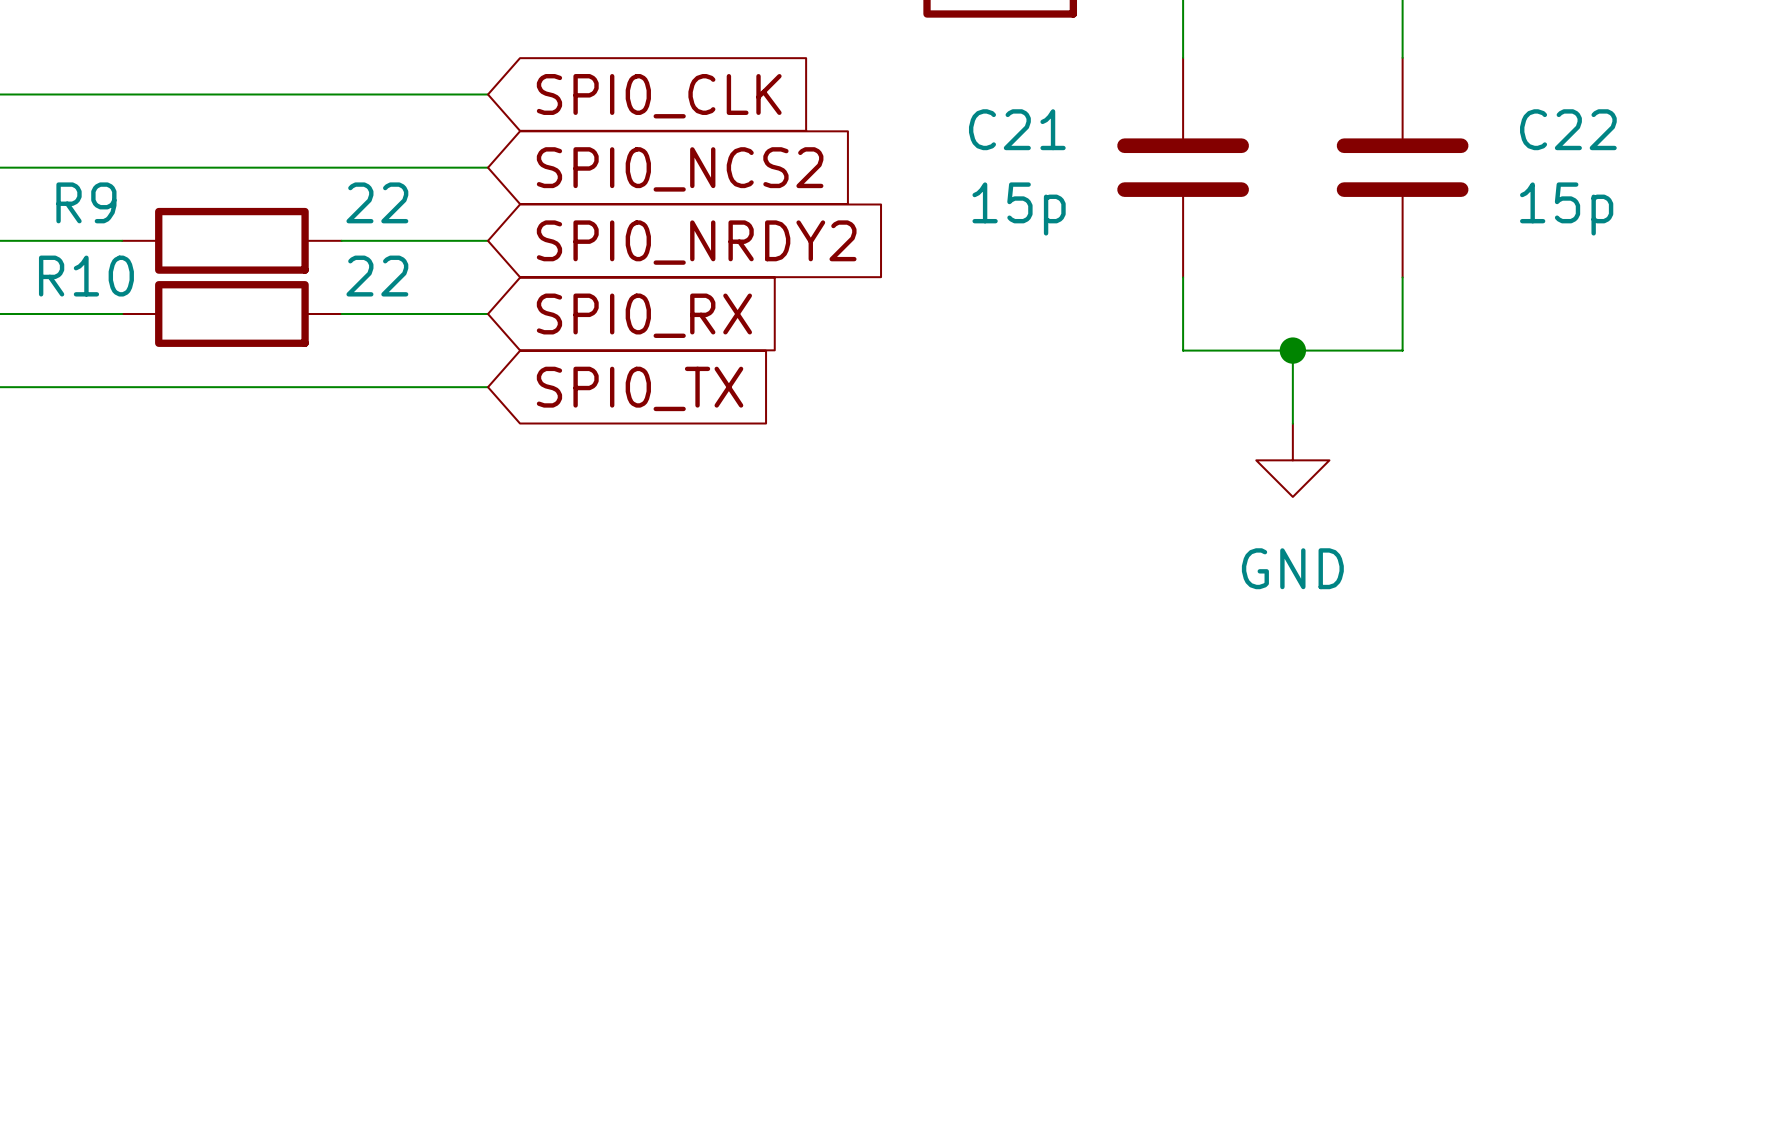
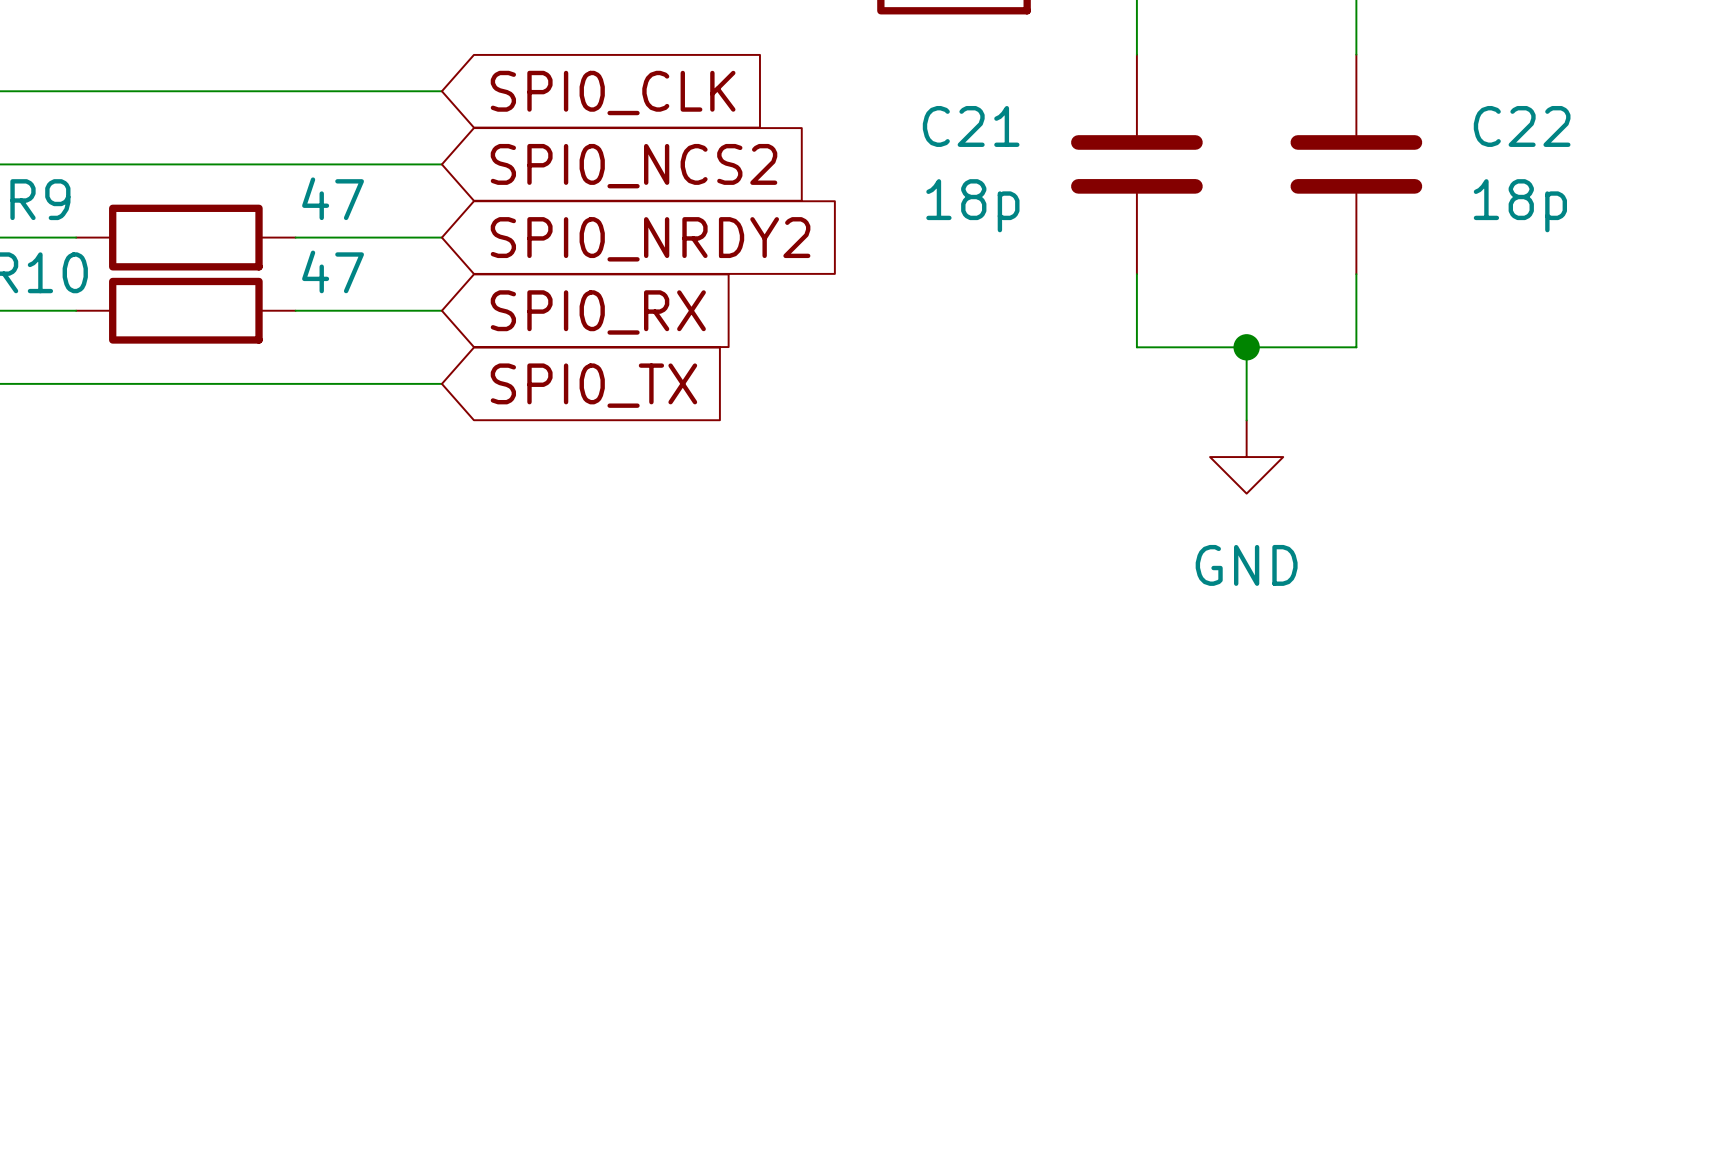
R9 value: 22 (377, 202) -> 47 (333, 198)
C21 value: 15p (1019, 208) -> 18p (972, 205)
C22 value: 15p (1566, 208) -> 18p (1520, 205)
R10 value: 22 (377, 276) -> 47 (333, 271)

